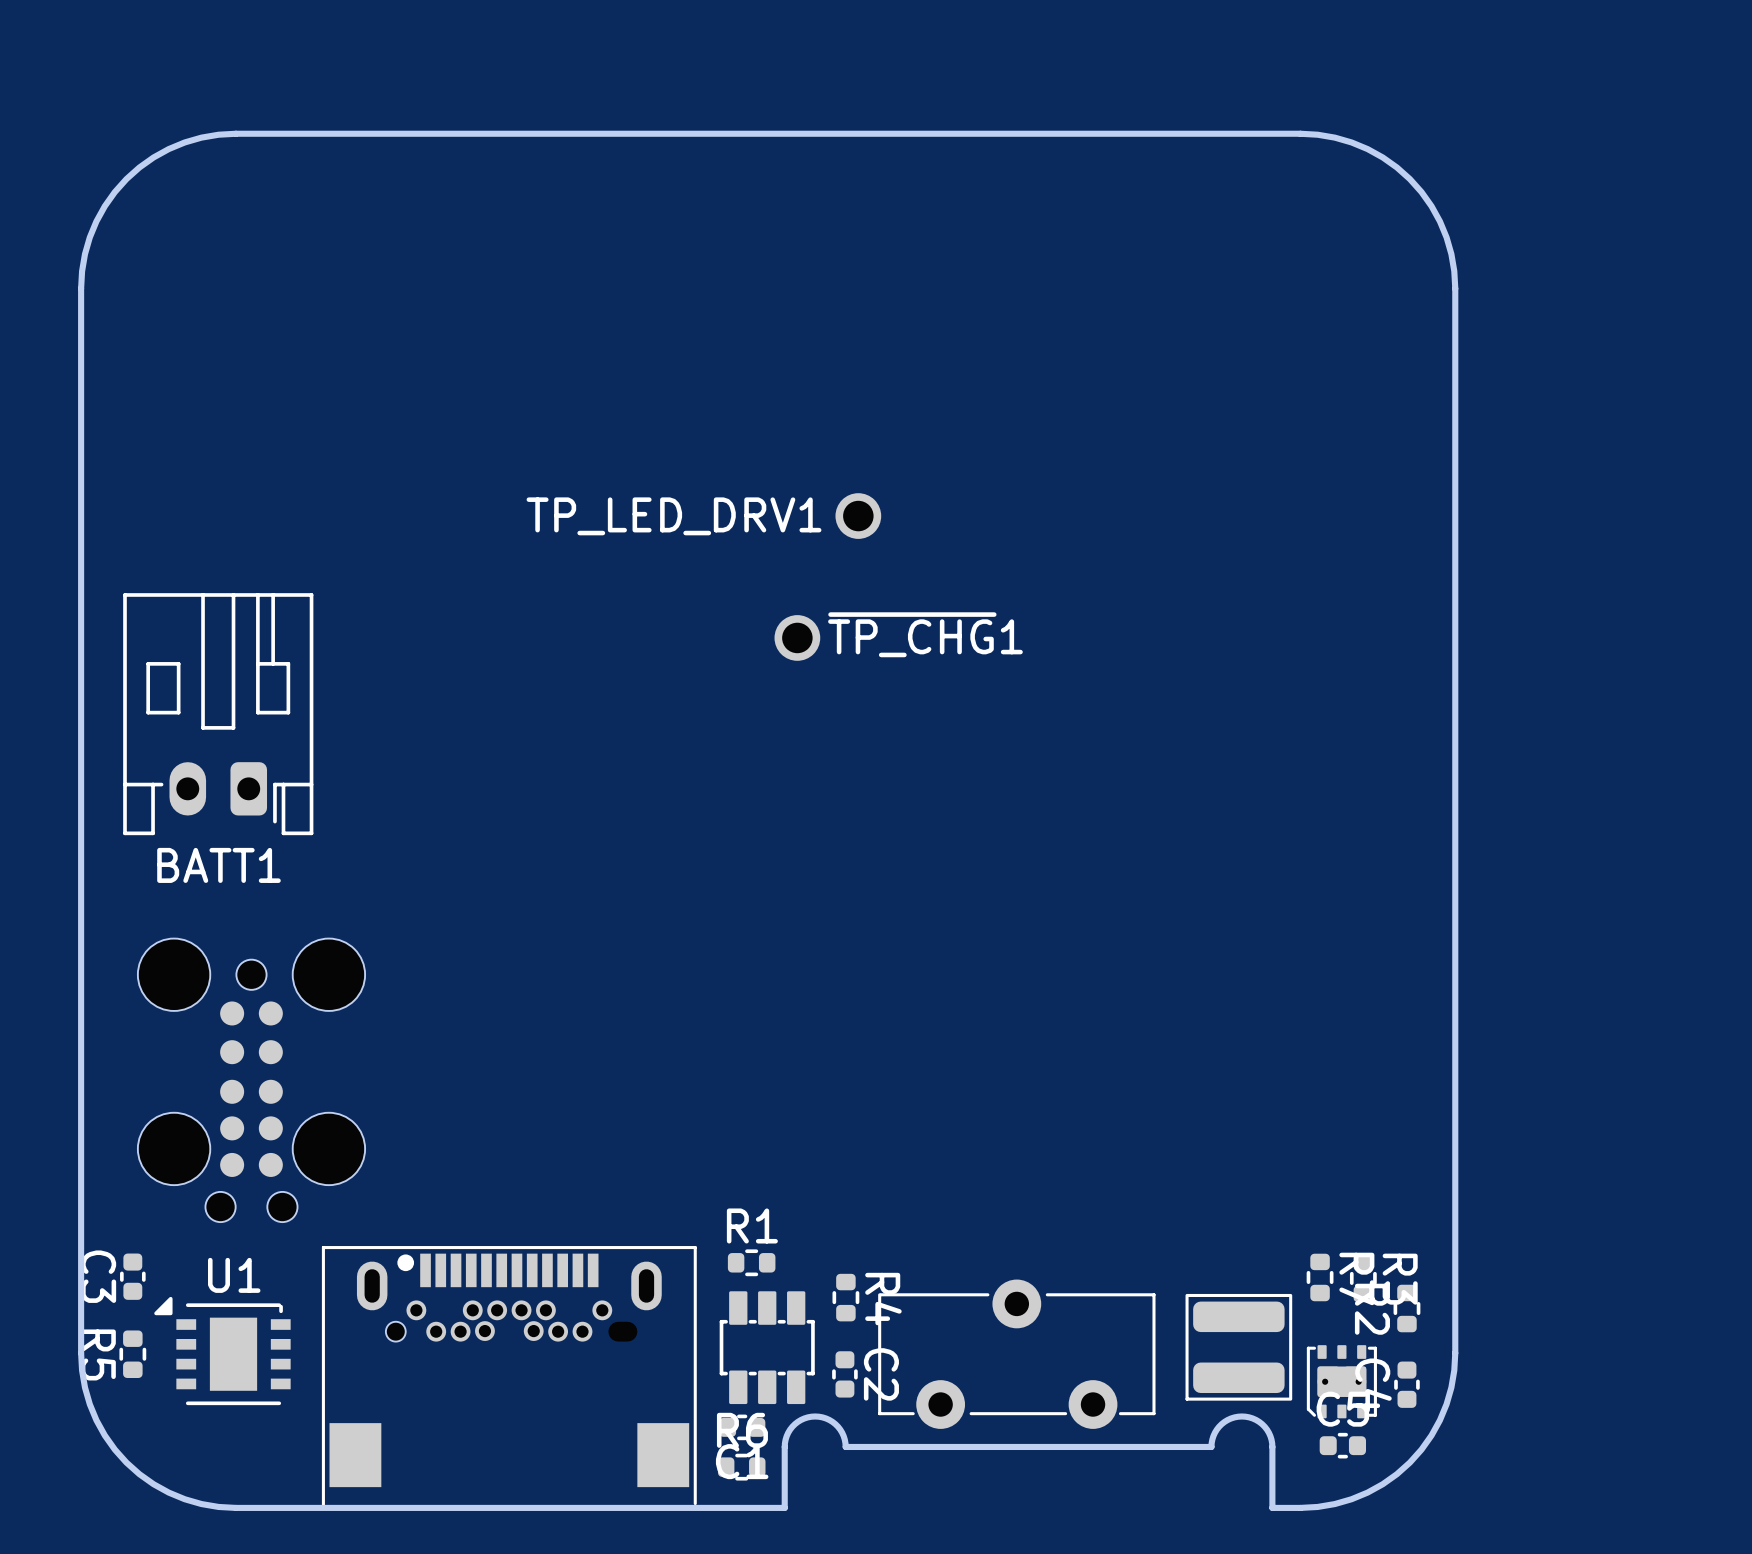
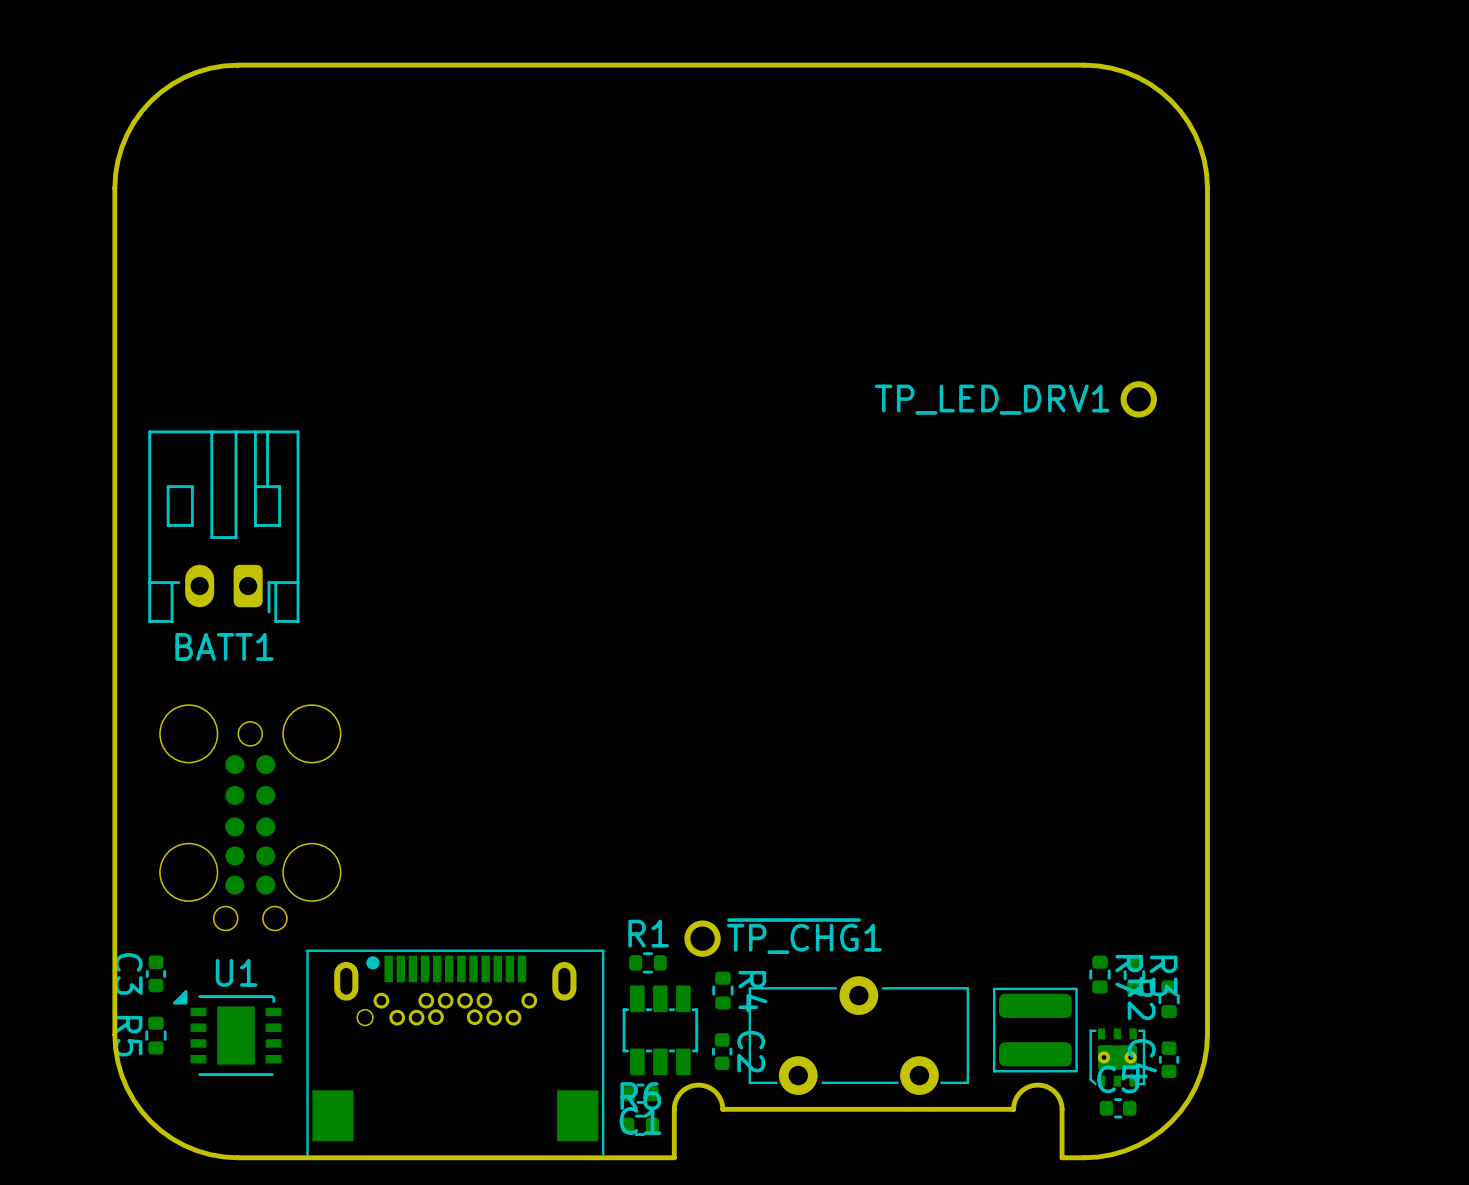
TP_LED_DRV1 position: (858, 516) -> (1138, 399)
~{TP_CHG}1 position: (797, 637) -> (702, 938)

